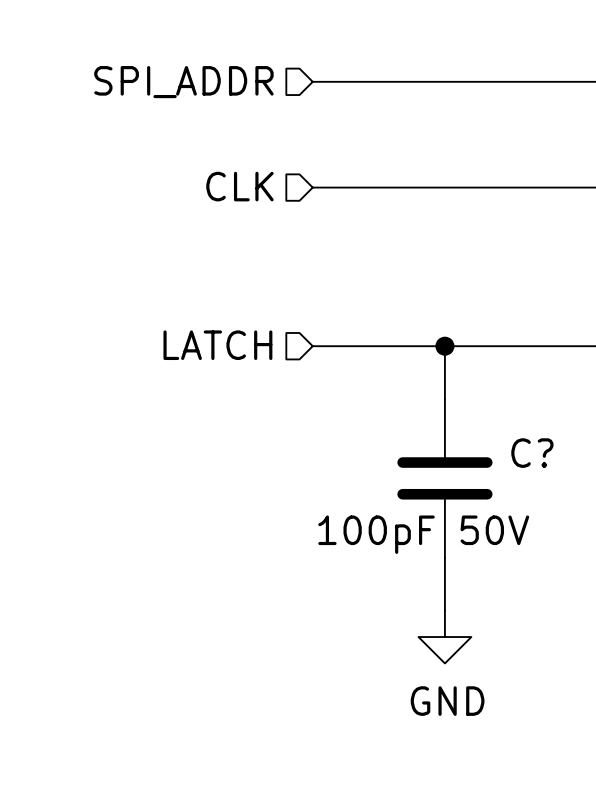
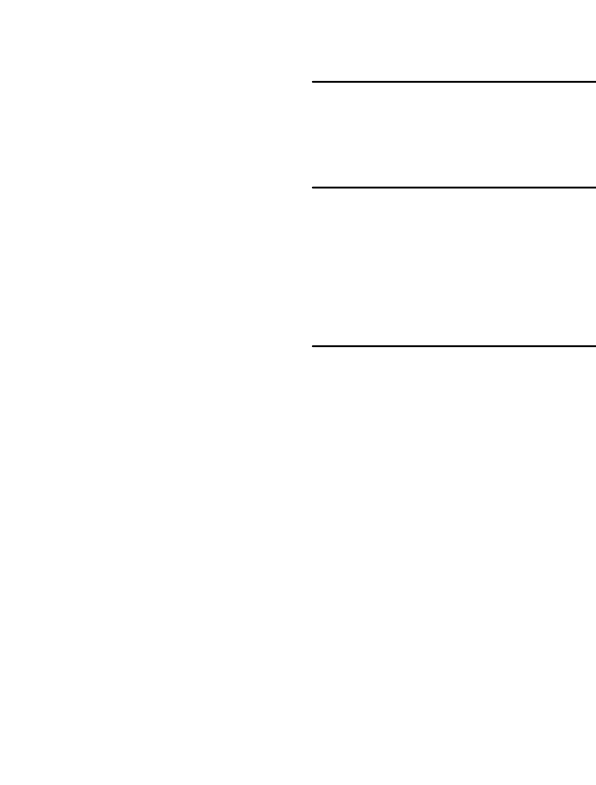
hierarchical label: SPI_ADDR (183, 82) -> none
hierarchical label: CLK (239, 186) -> none
hierarchical label: LATCH (217, 345) -> none
wire: (444, 346) (444, 399) -> none
junction: (444, 346) -> none
C?: 100pF 50V (444, 478) -> none
wire: (444, 557) (444, 610) -> none
power symbol: GND (444, 637) -> none

